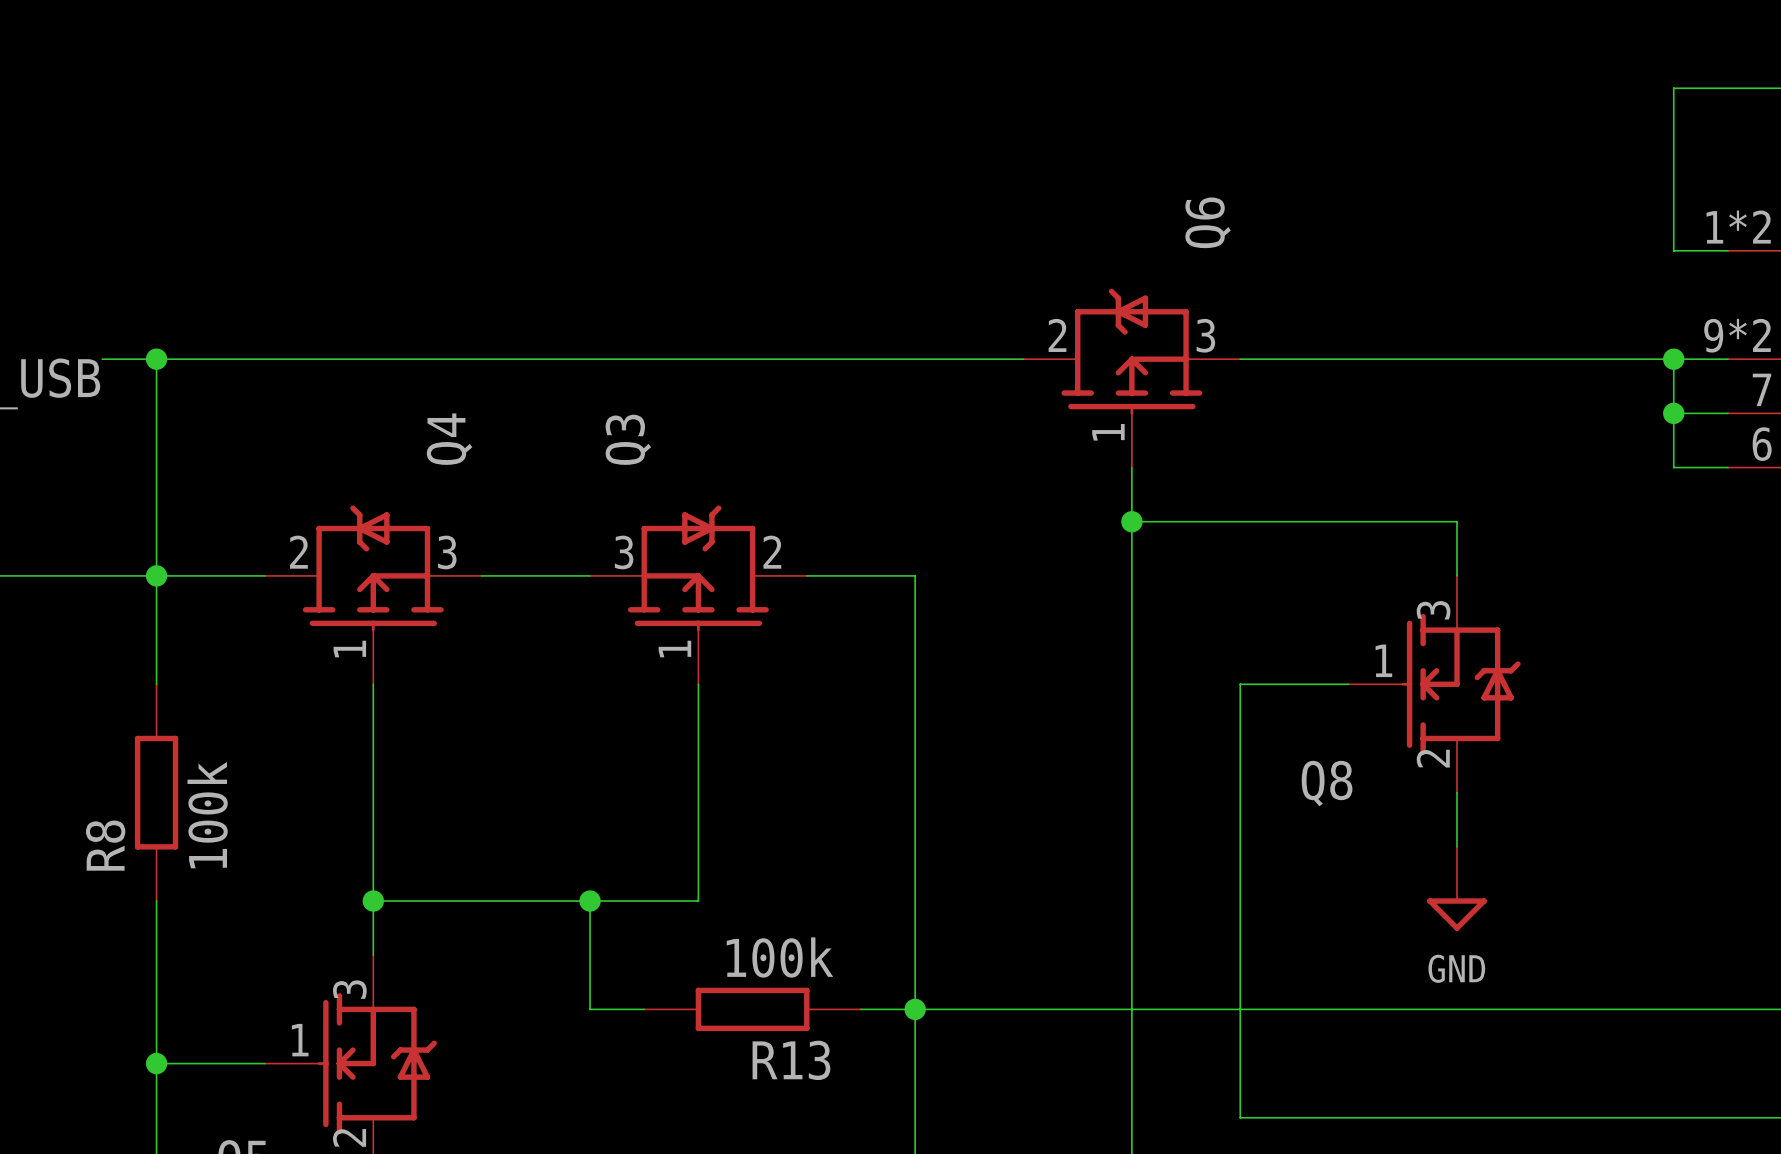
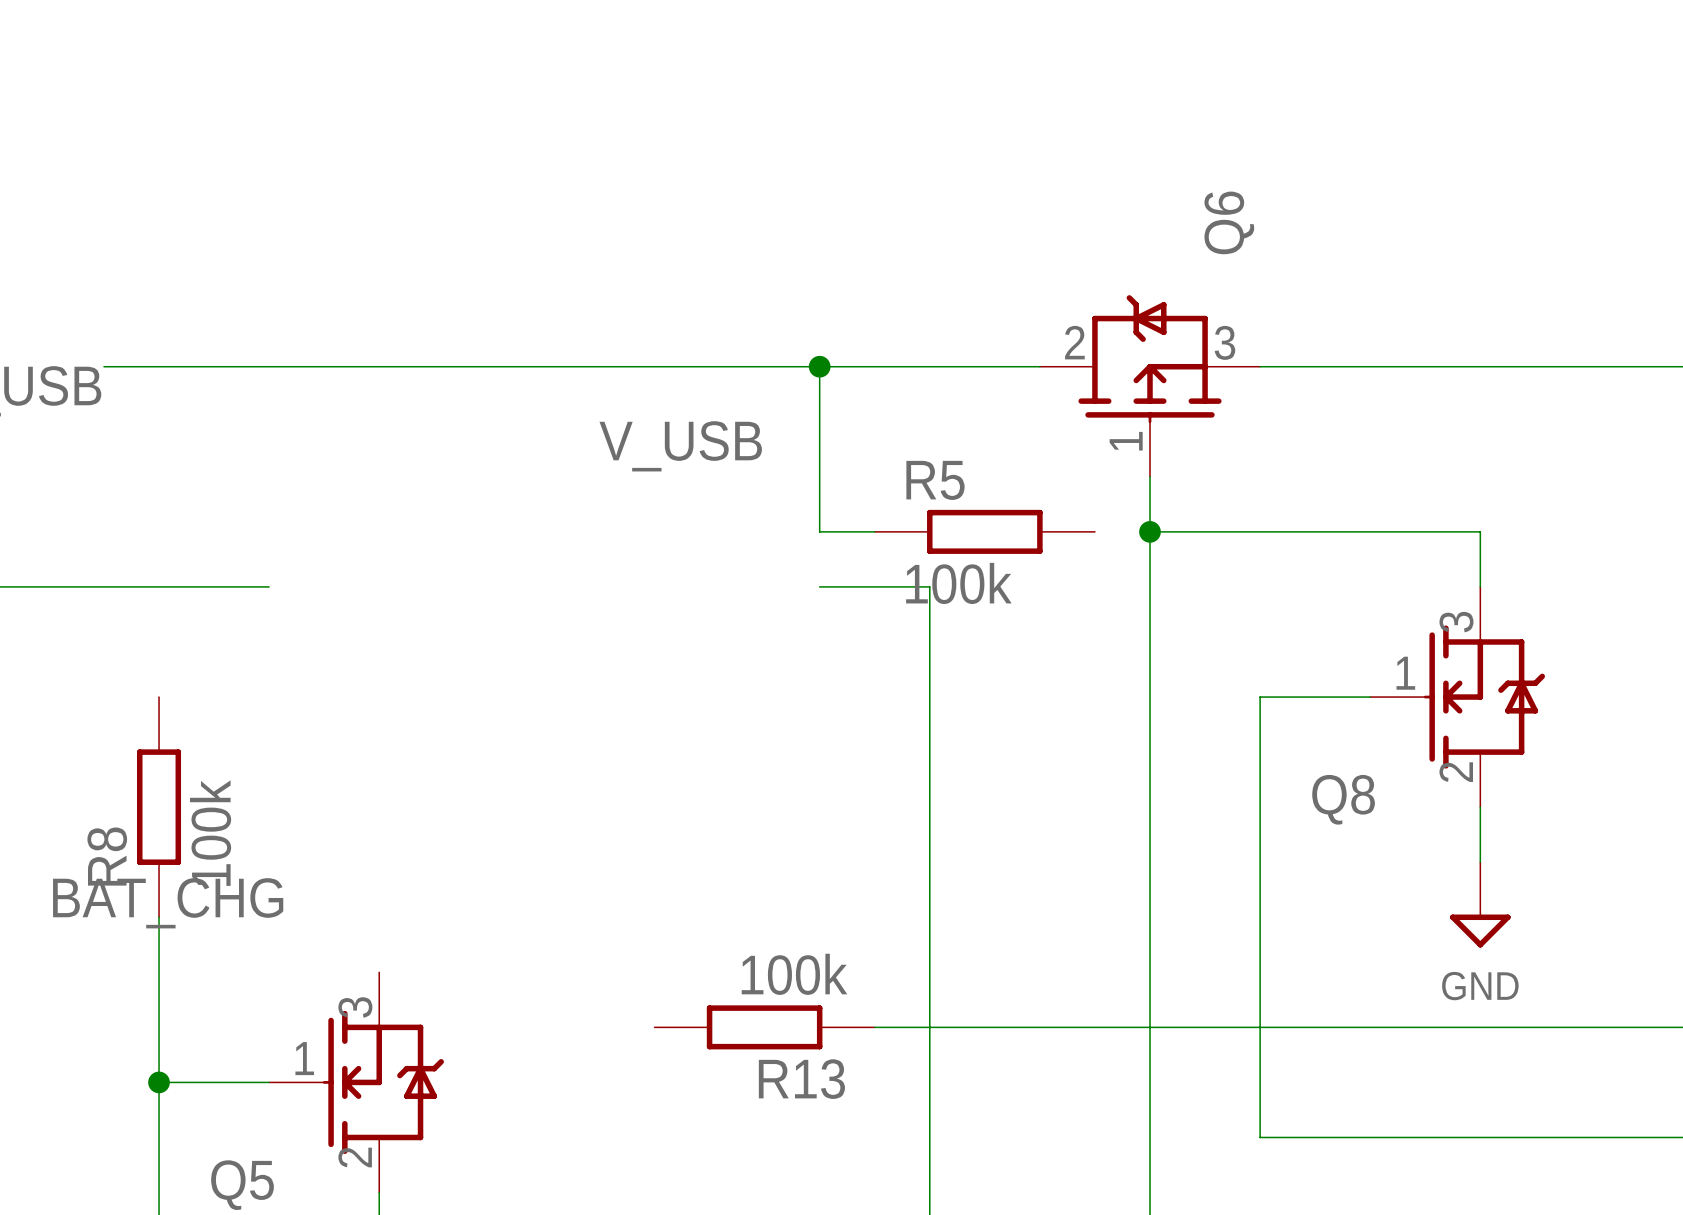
wire: (156, 359) (156, 684) -> none
junction: (156, 359) -> none
wire: none -> (819, 366) (819, 531) (874, 531)
junction: none -> (819, 366)
label: none -> V_USB (680, 446)
R5: none -> 100k (984, 531)
junction: (156, 575) -> none
wire: (481, 575) (590, 575) -> none
Q4: (373, 594) -> none
Q3: (698, 594) -> none
wire: (373, 684) (373, 955) -> none
wire: (698, 684) (698, 901) (373, 901) -> none
label: none -> BAT_CHG (168, 903)
junction: (373, 901) -> none
wire: (590, 901) (590, 1009) (644, 1009) -> none
junction: (590, 901) -> none
junction: (915, 1009) -> none

